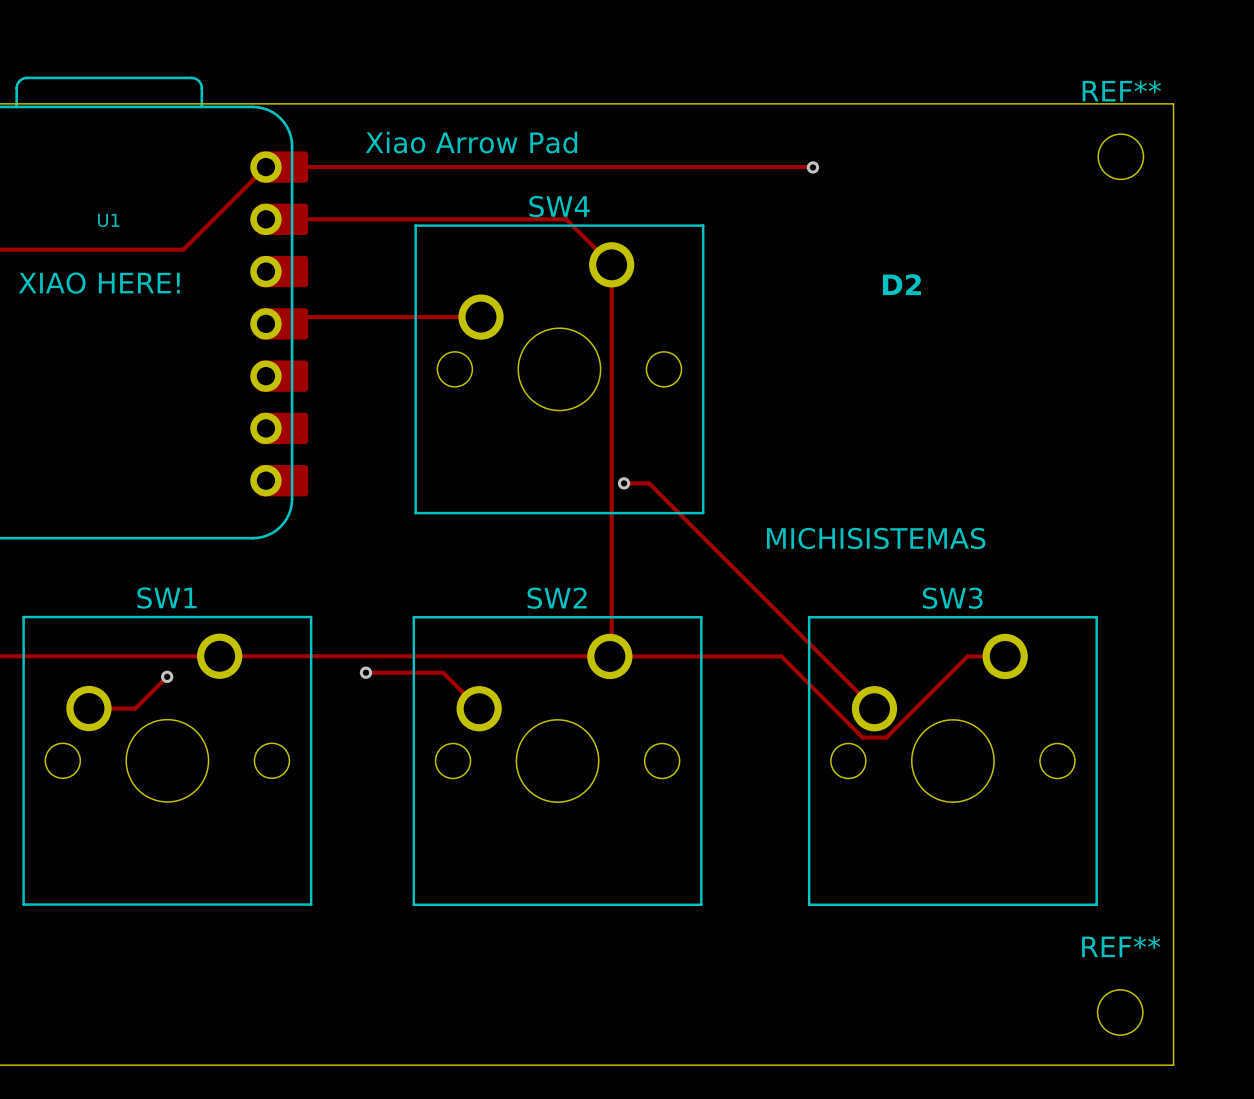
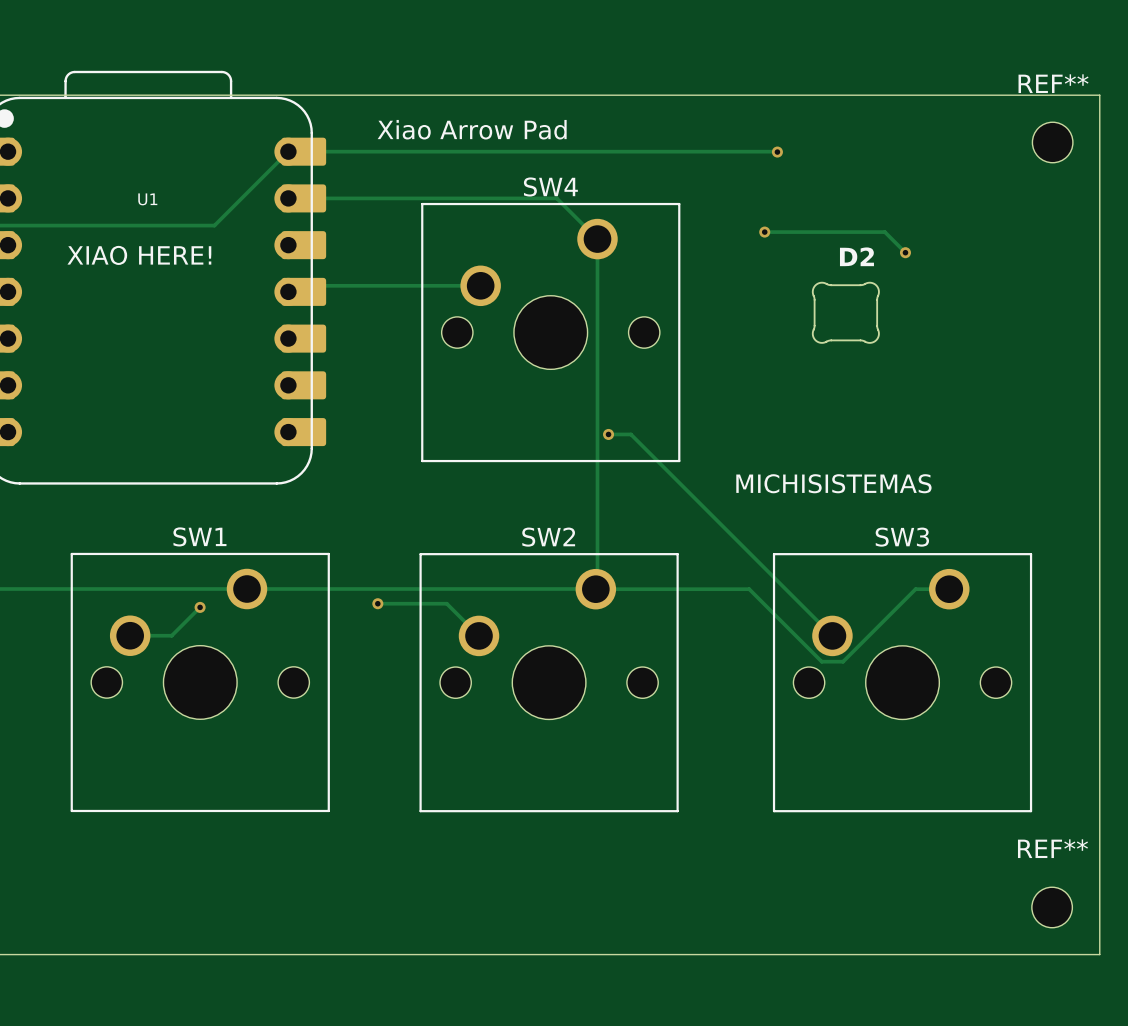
track: none -> (764, 232) (884, 232) (905, 253)
via: none -> (764, 232)
D2 footprint: [882, 274, 921, 296] -> [811, 281, 880, 344]
via: none -> (905, 252)

